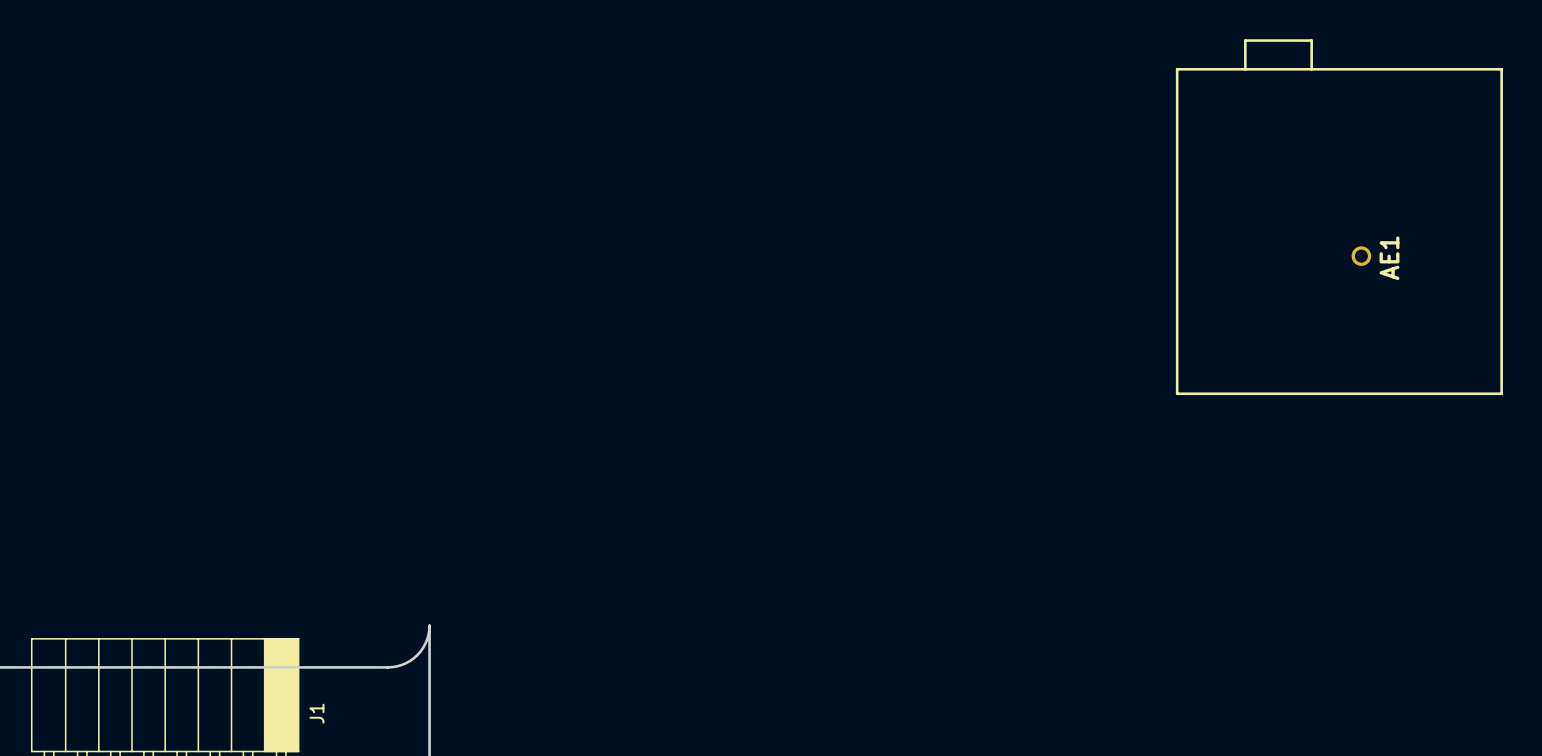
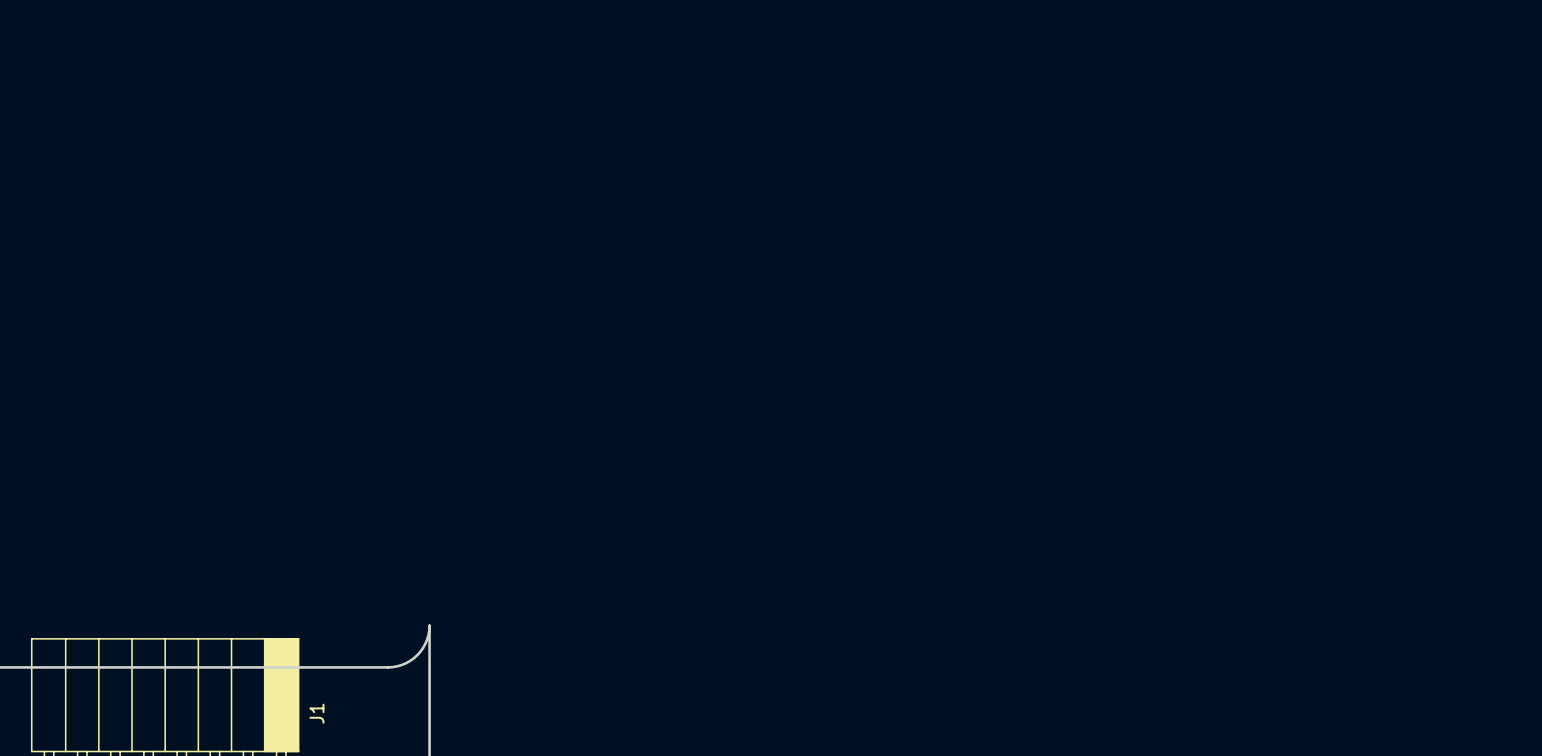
AE1: (1339, 217) -> none

